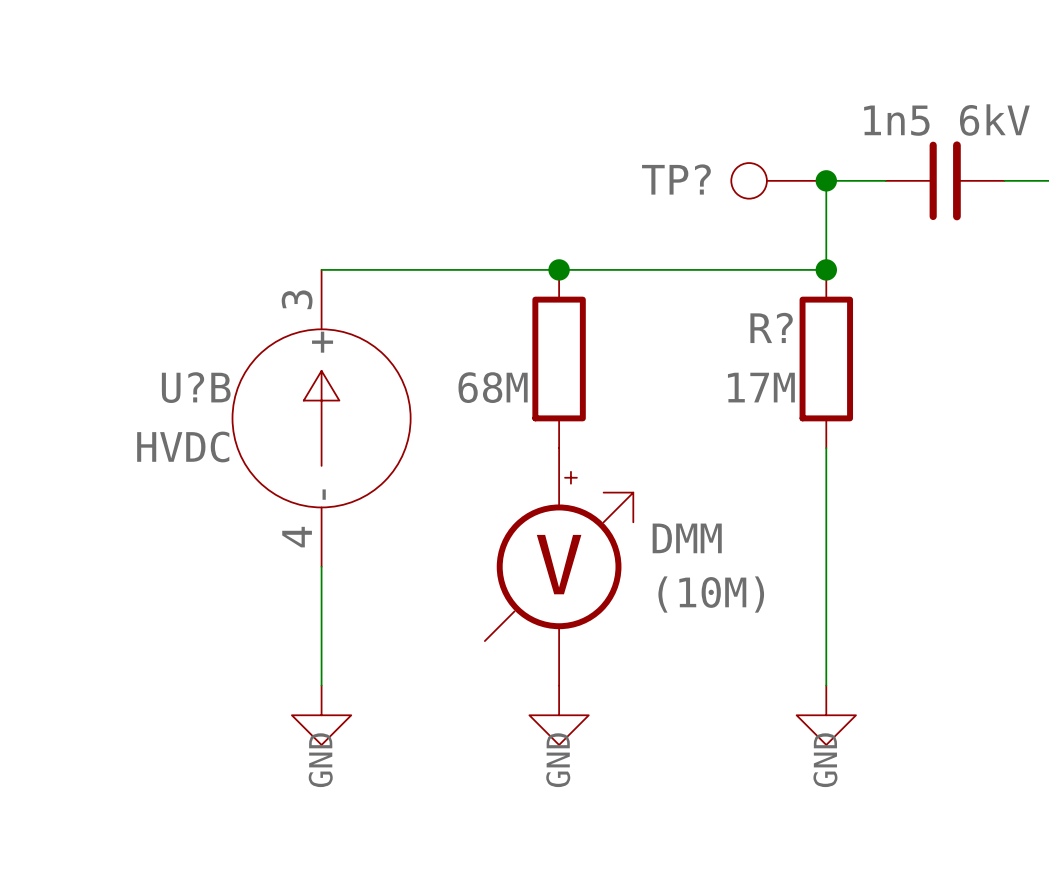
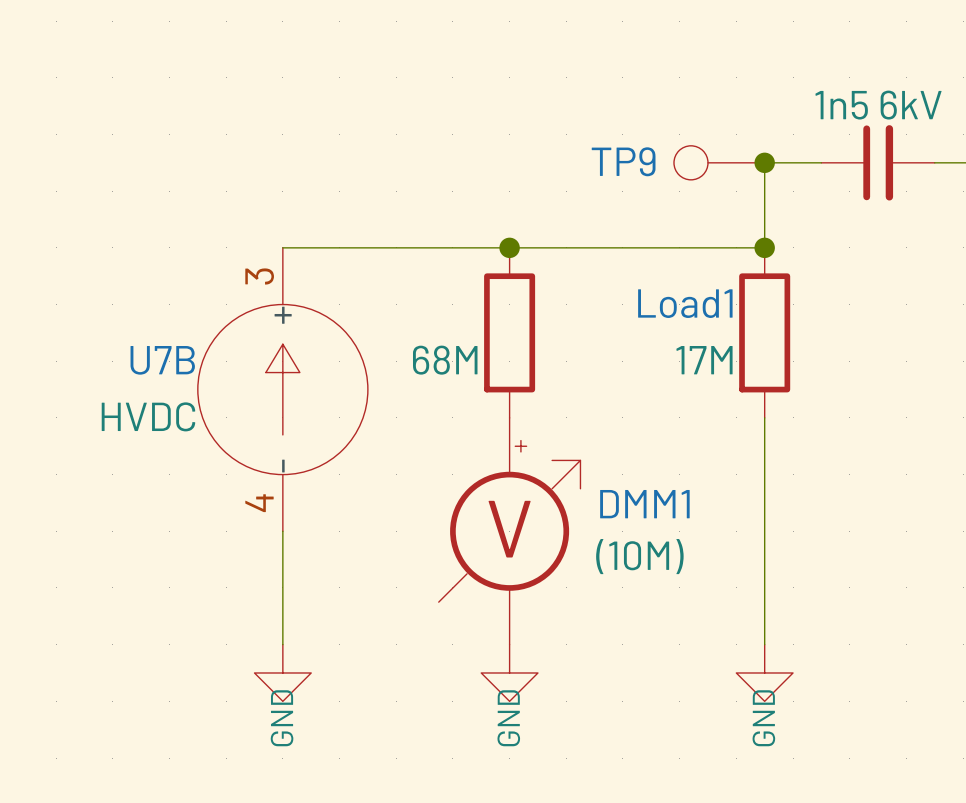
TP? name: TP? (676, 179) -> TP9 (623, 161)
R? name: R? (771, 327) -> Load1 (685, 303)
U?B name: U?B (196, 387) -> U7B (162, 360)
DMM name: DMM (687, 538) -> DMM1 (644, 504)

